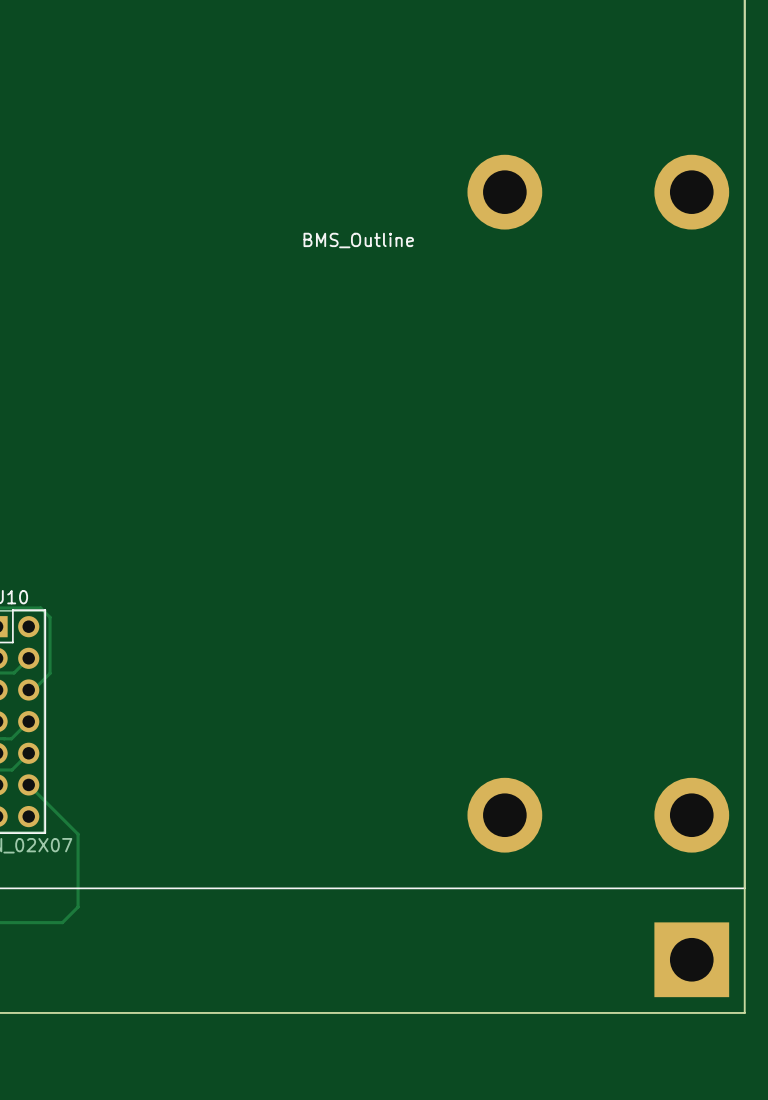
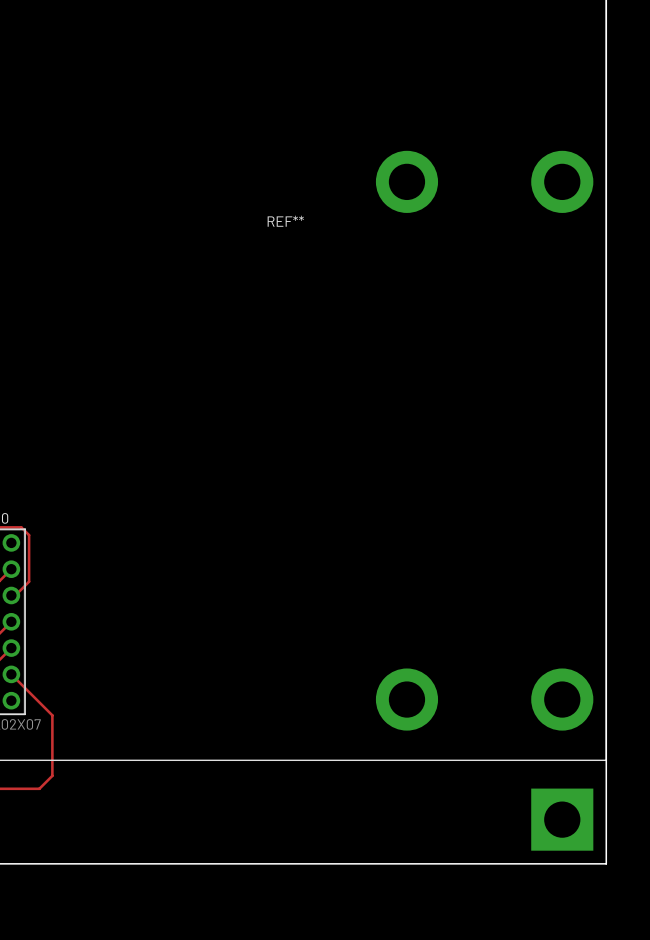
BMS_Outline name: BMS_Outline (358, 240) -> REF** (285, 221)

